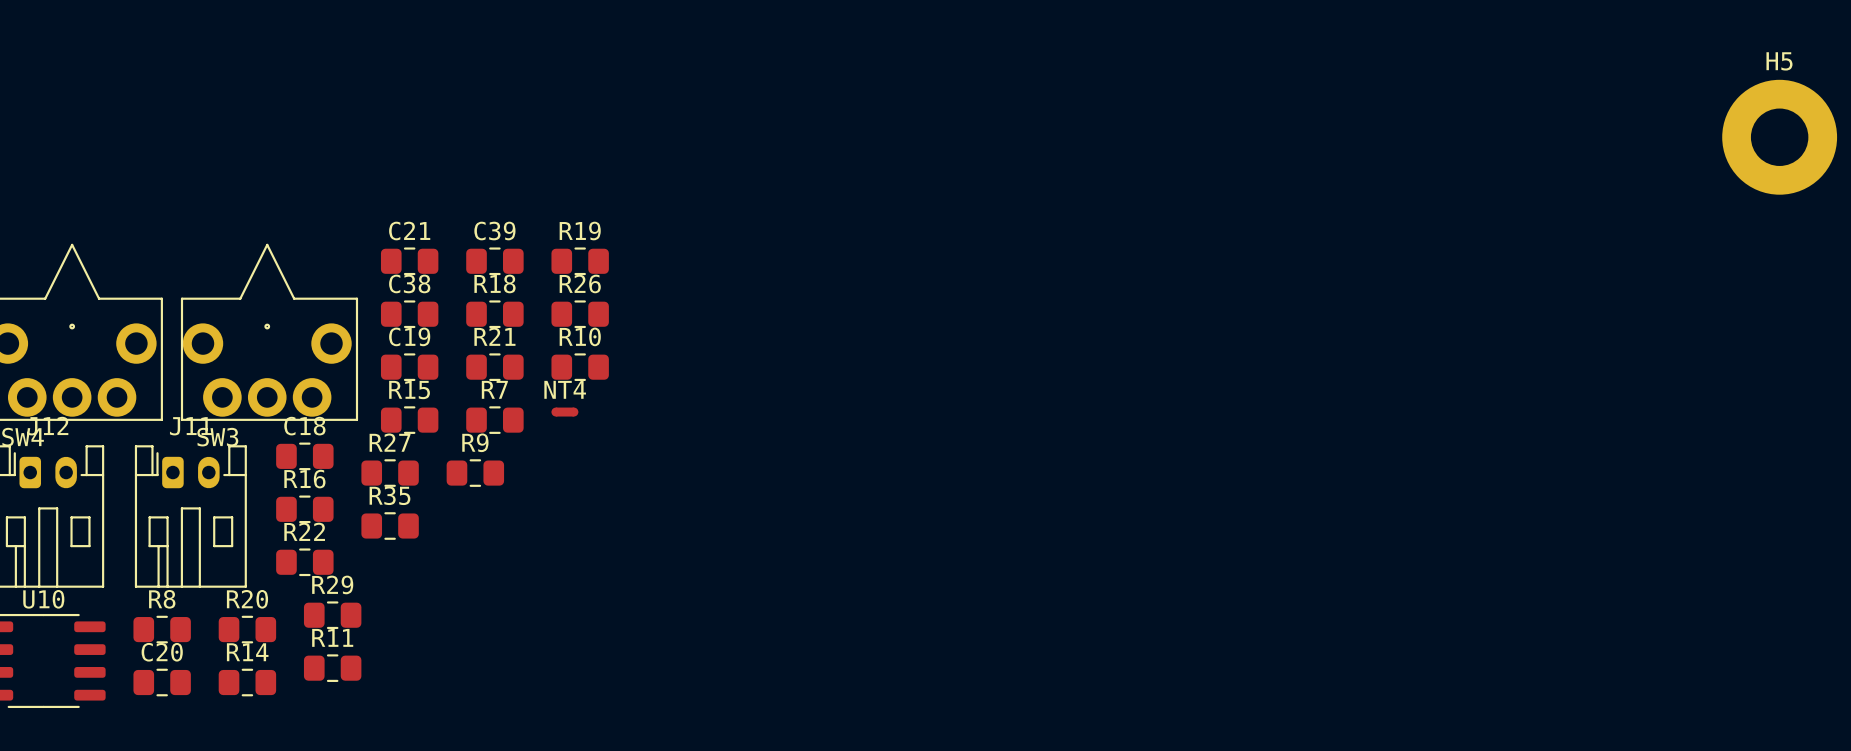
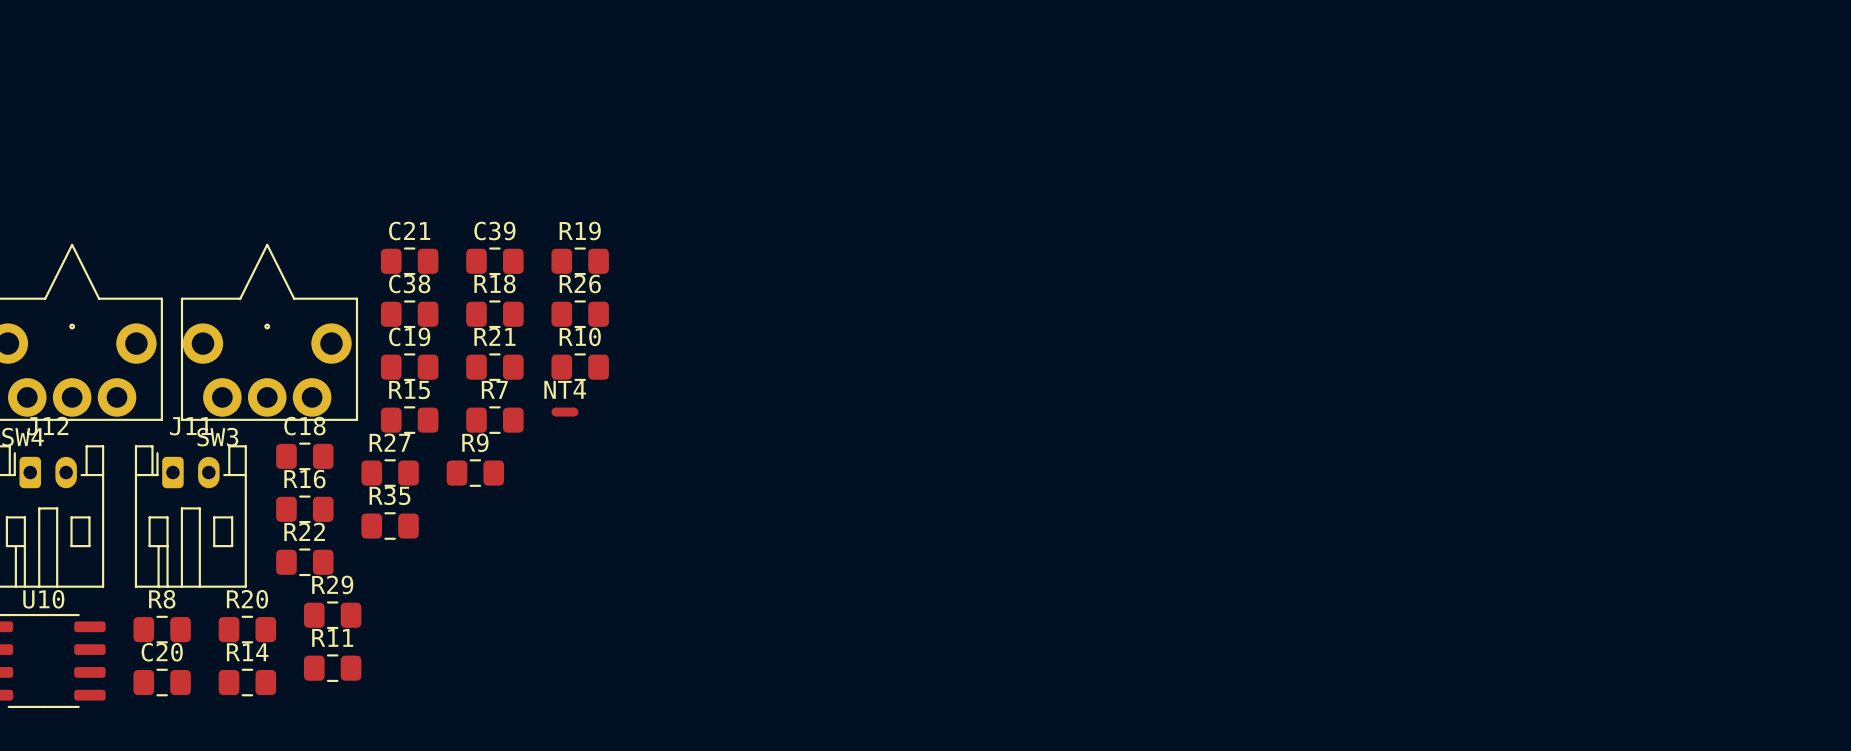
H5: (1779, 137) -> none

